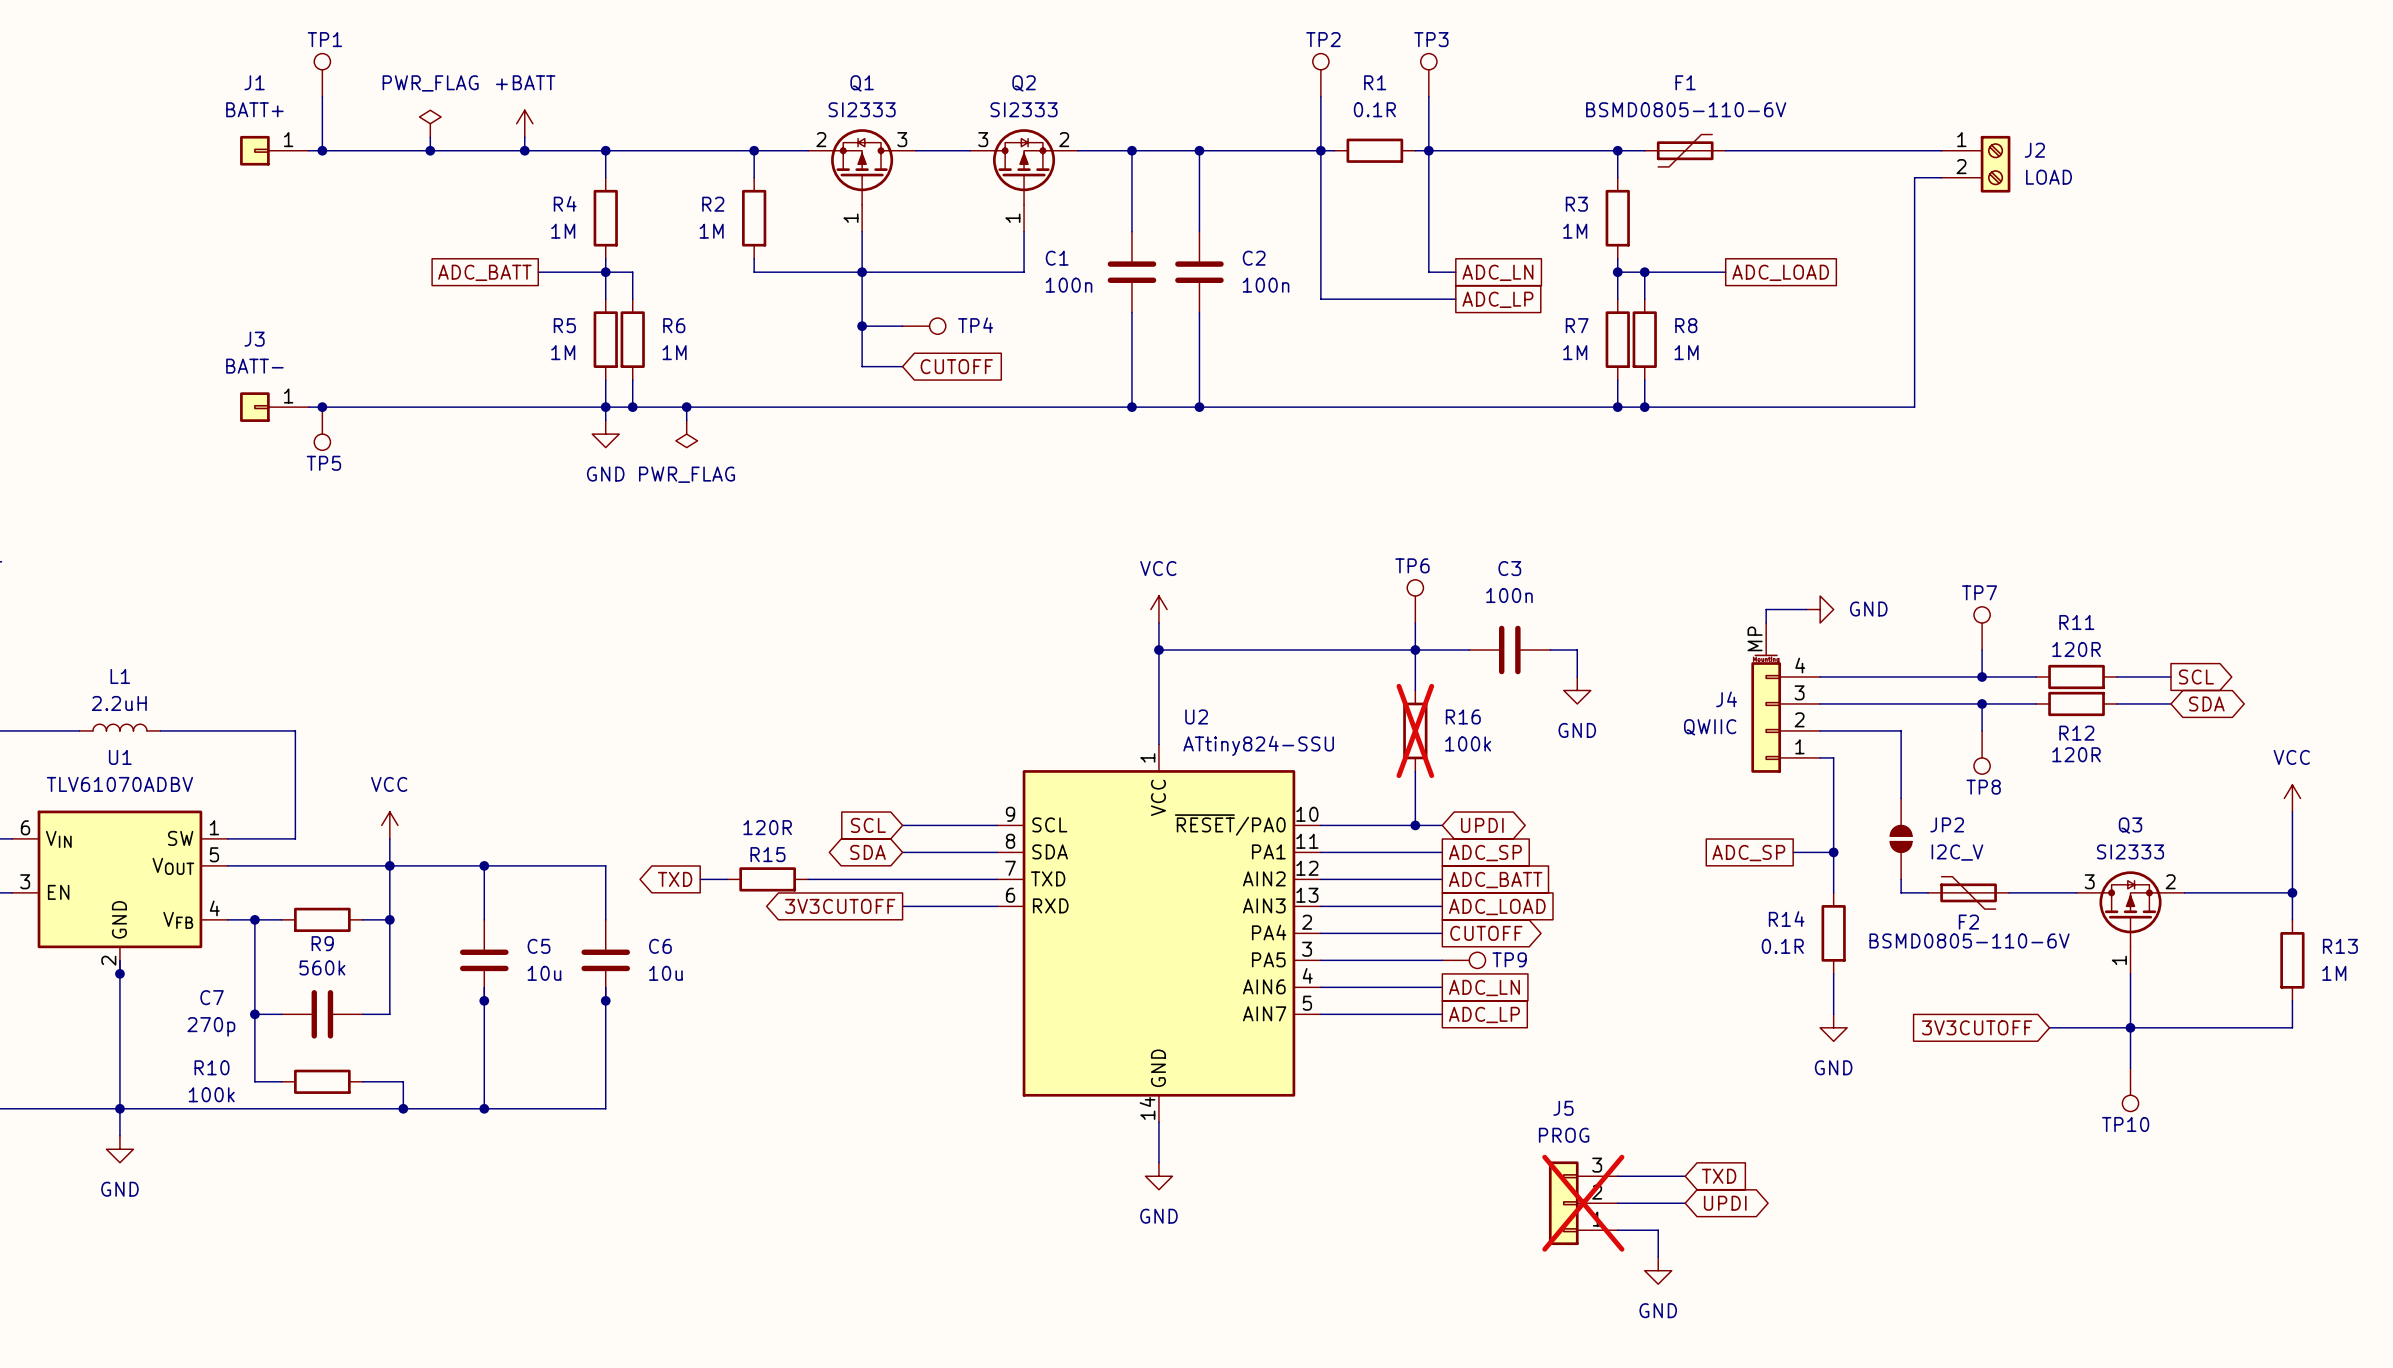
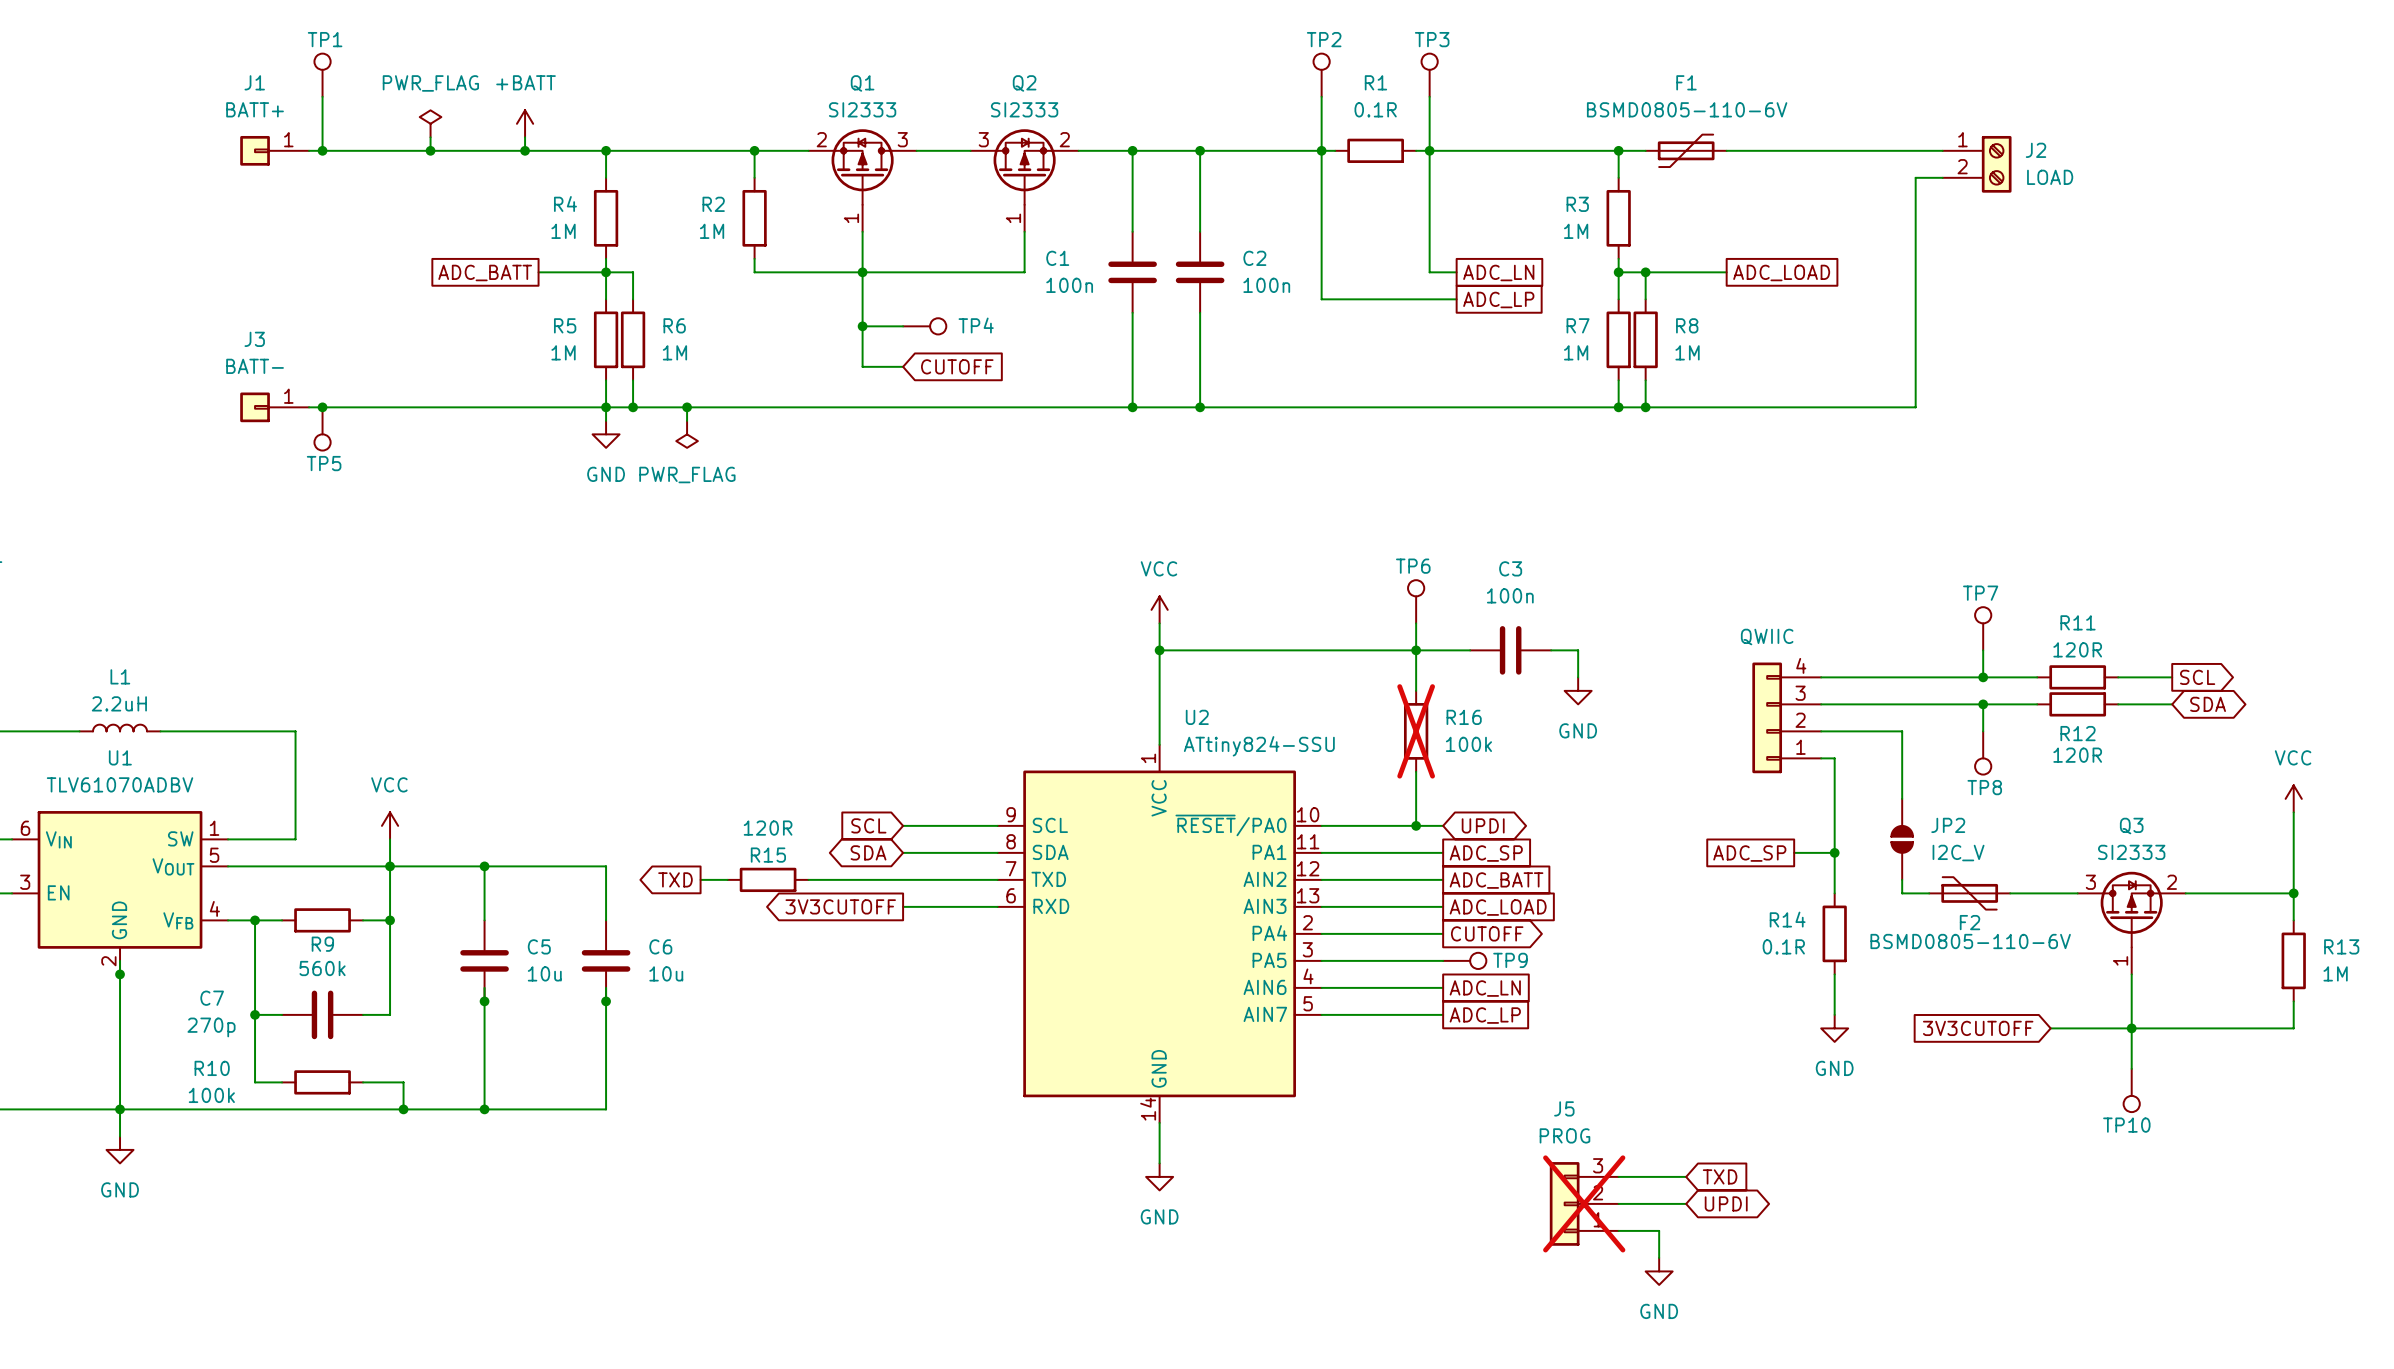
wire: (1806, 609) (1766, 609) (1766, 623) -> none
power symbol: GND (1820, 609) -> none
J4: QWIIC (1785, 697) -> none
part: none -> QWIIC (1786, 717)

